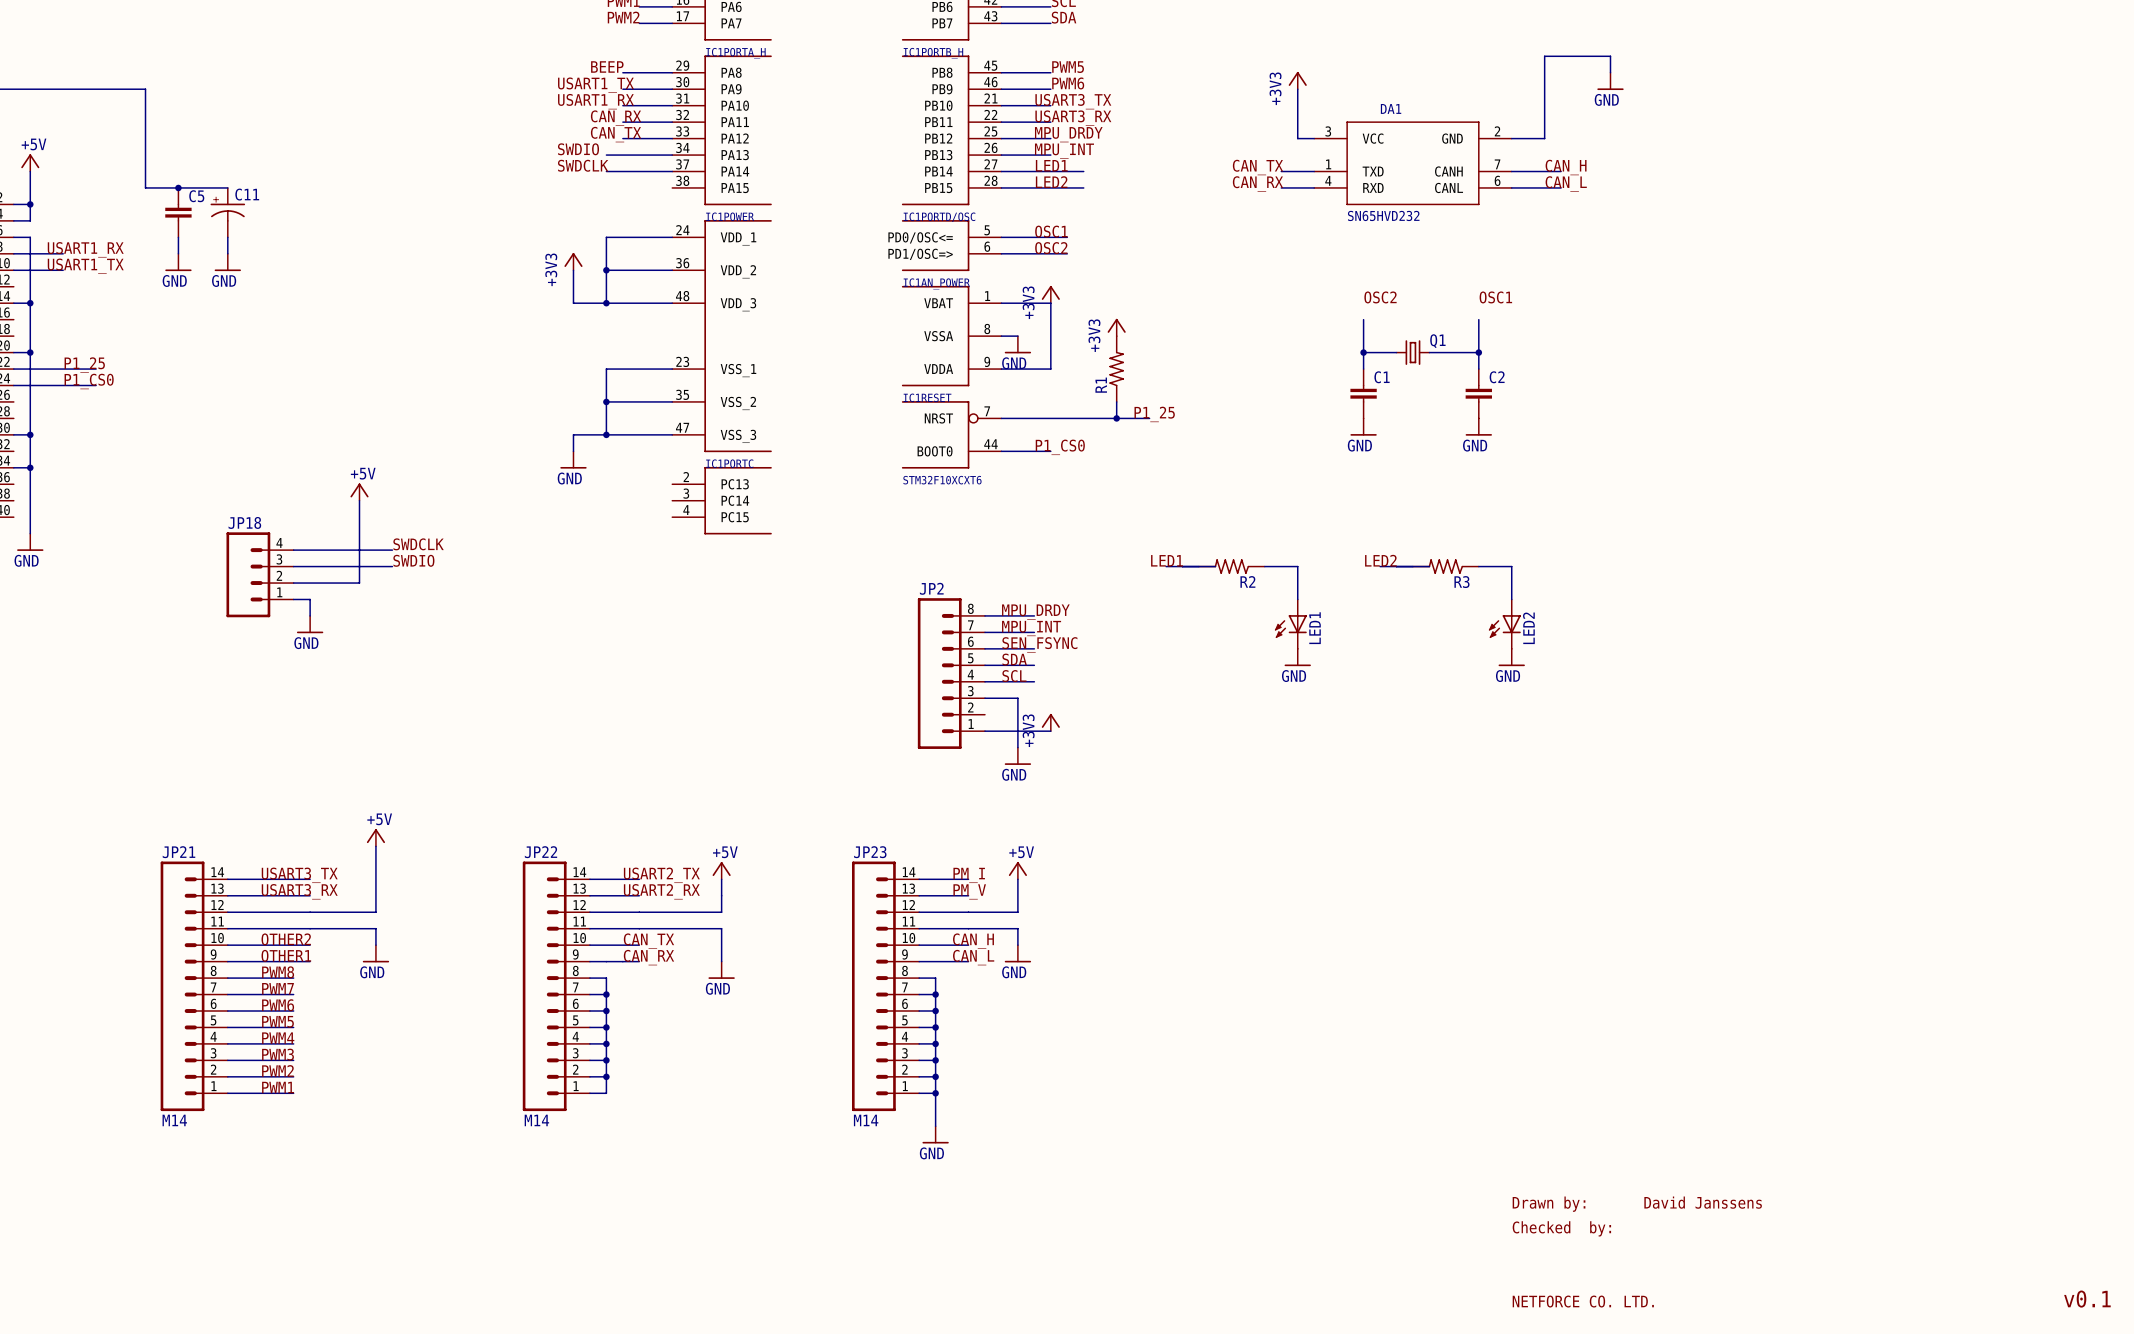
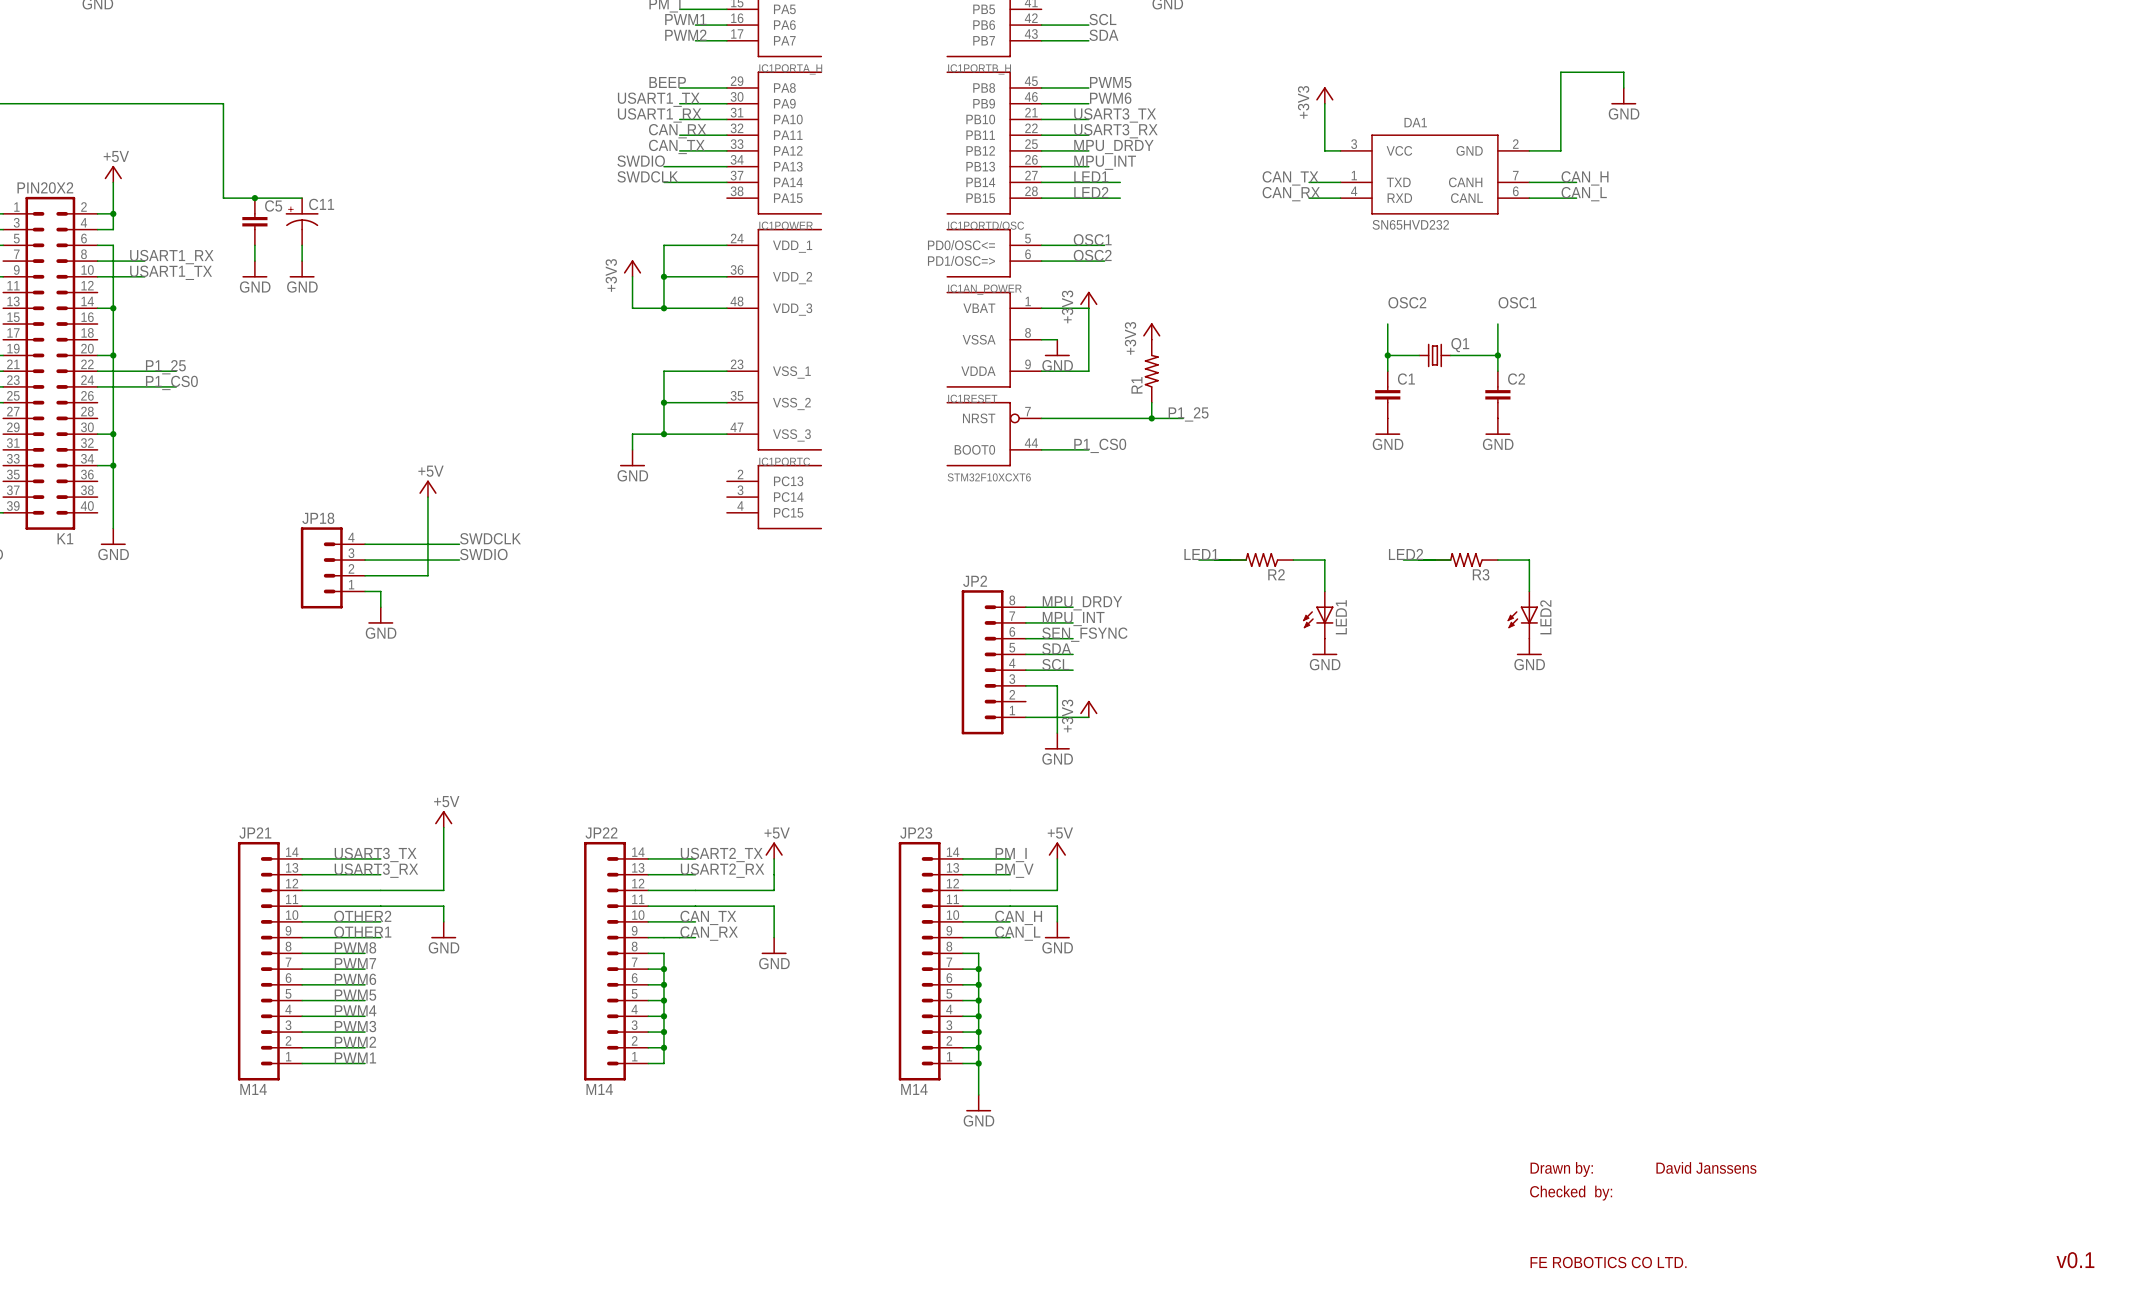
text: NETFORCE CO. LTD. (1583, 1301) -> FE ROBOTICS CO LTD. (1608, 1262)

